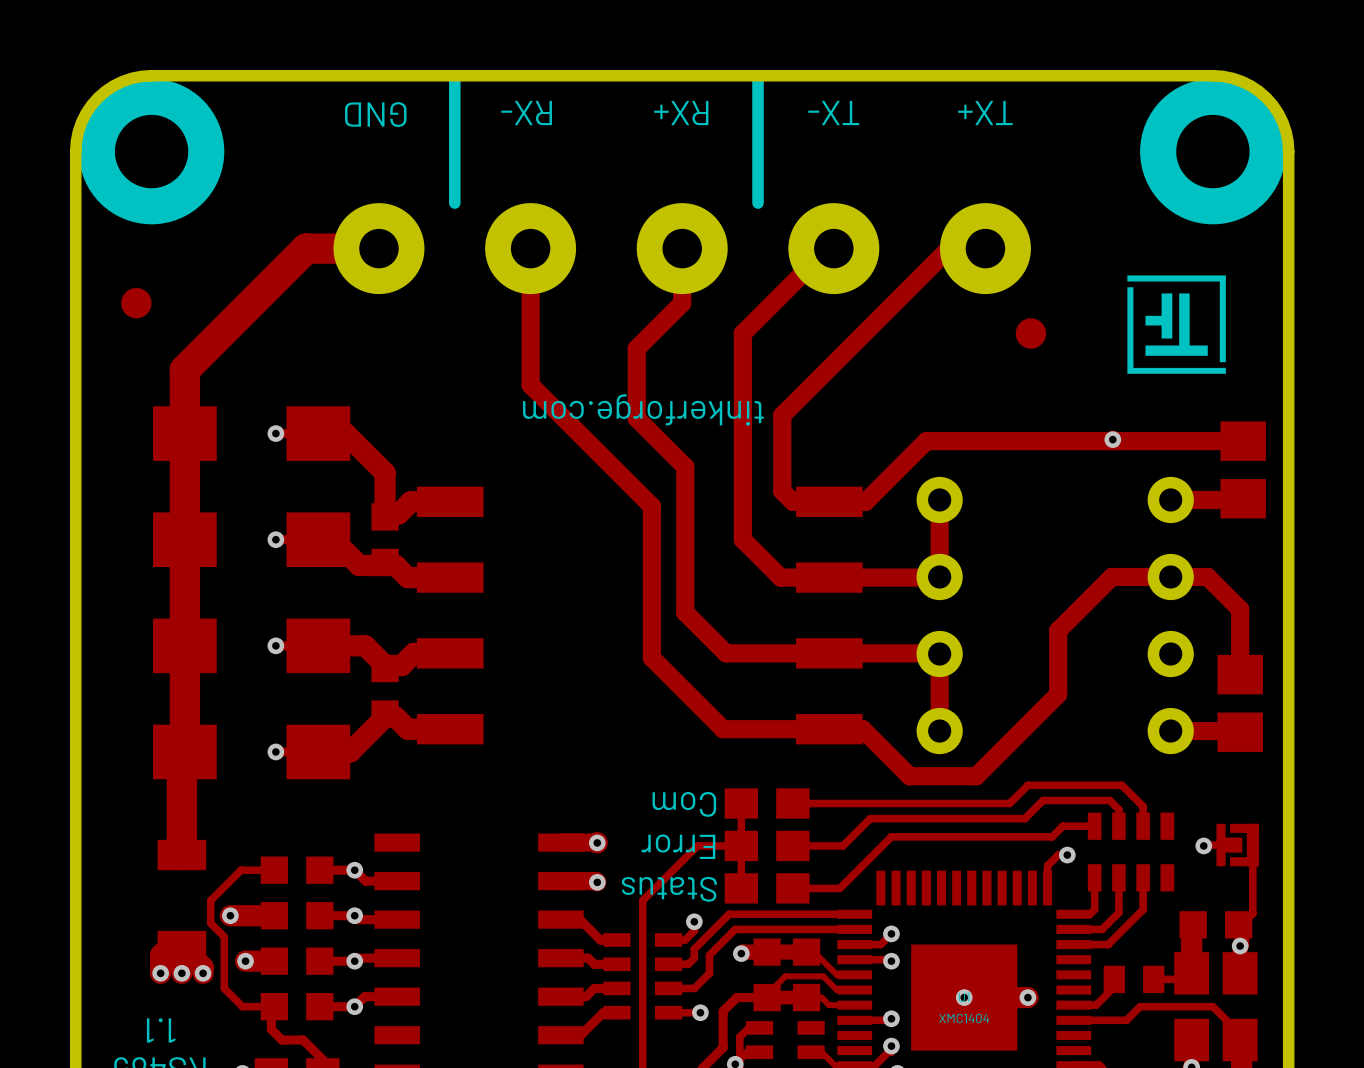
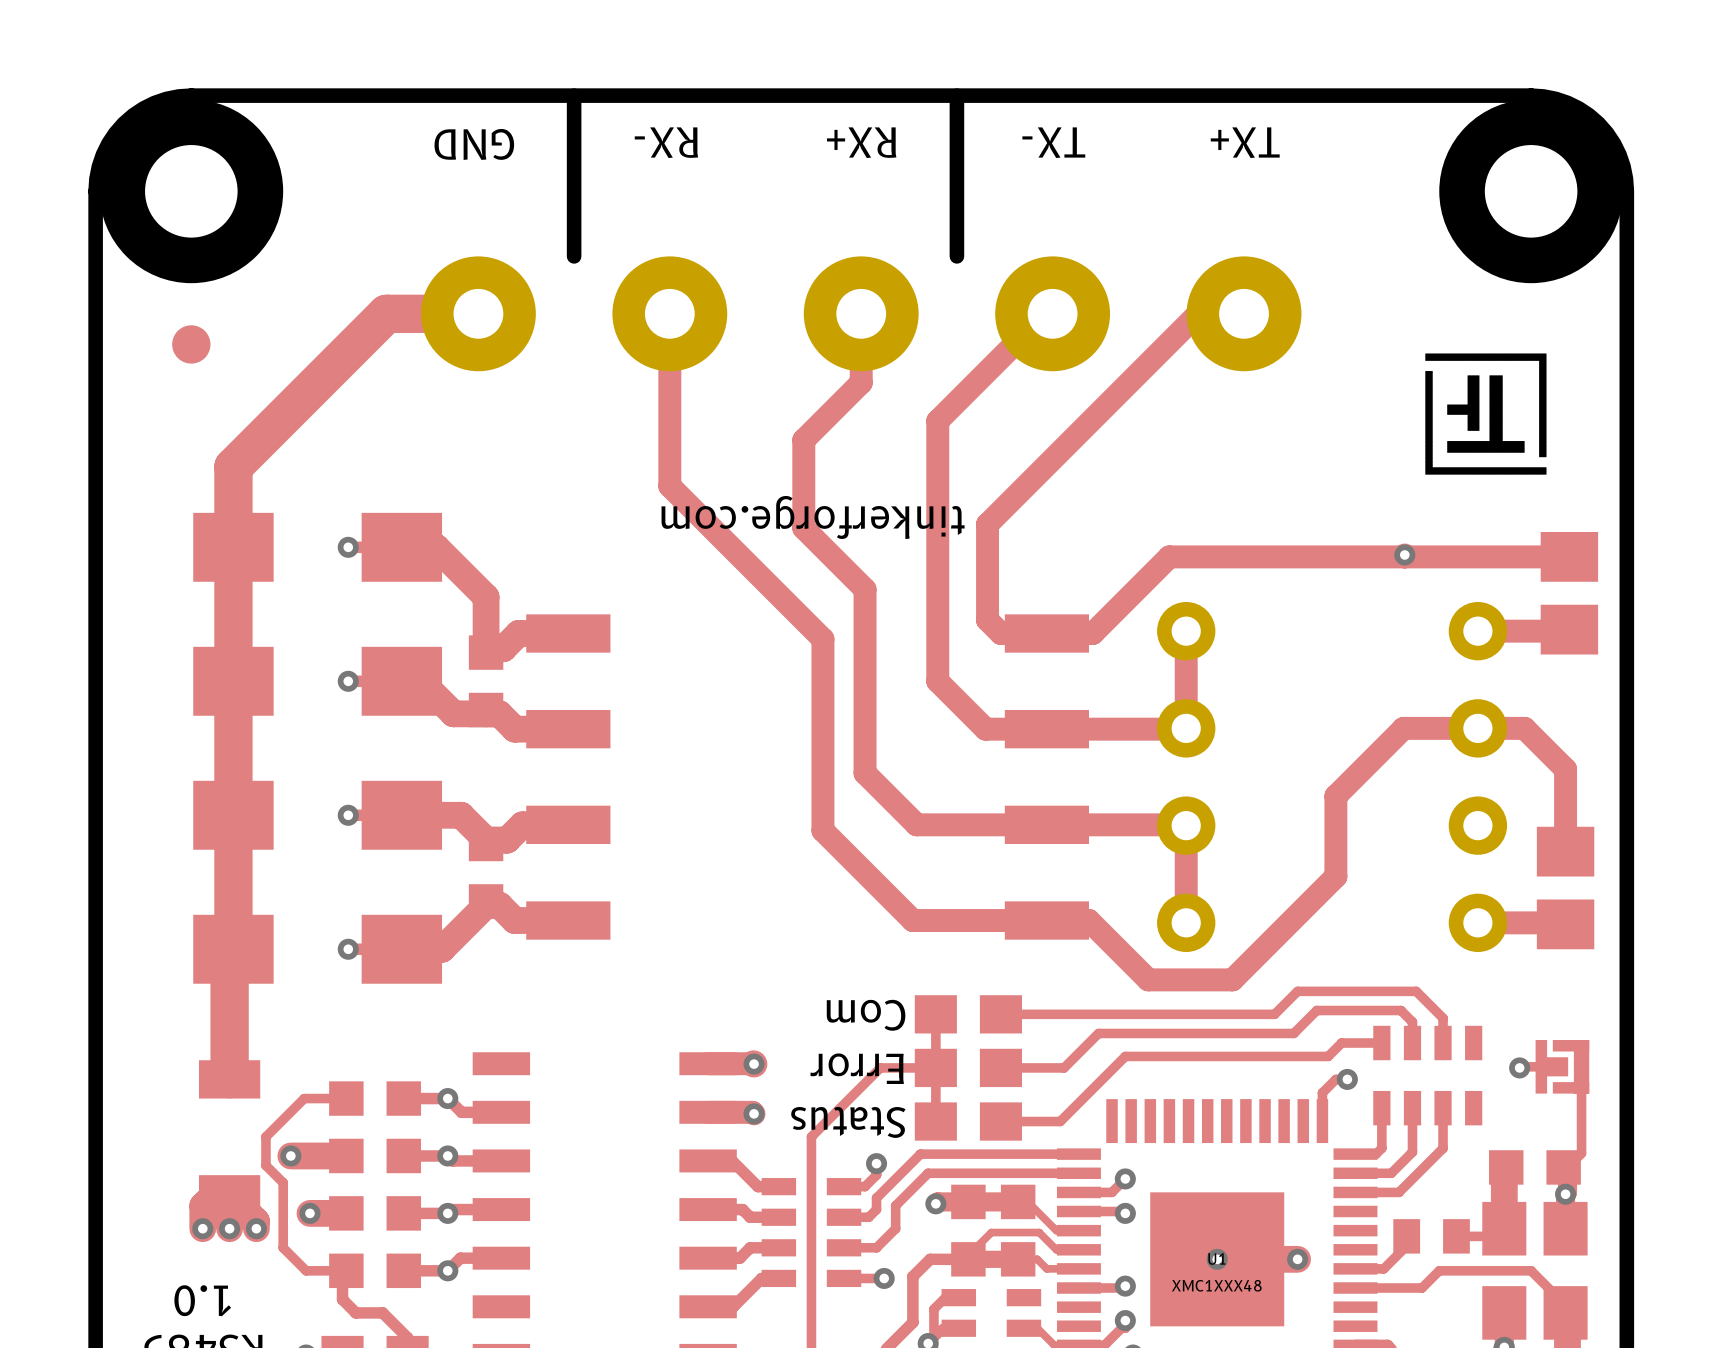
drawing shape: [1127, 275, 1226, 374] -> [1425, 353, 1547, 475]
part position: (136, 303) -> (191, 344)
part: (1030, 333) -> none
U1 value: XMC1404 (964, 1018) -> XMC1XXX48 (1216, 1285)
text: 1.1 (161, 1030) -> 1.0 (202, 1300)

